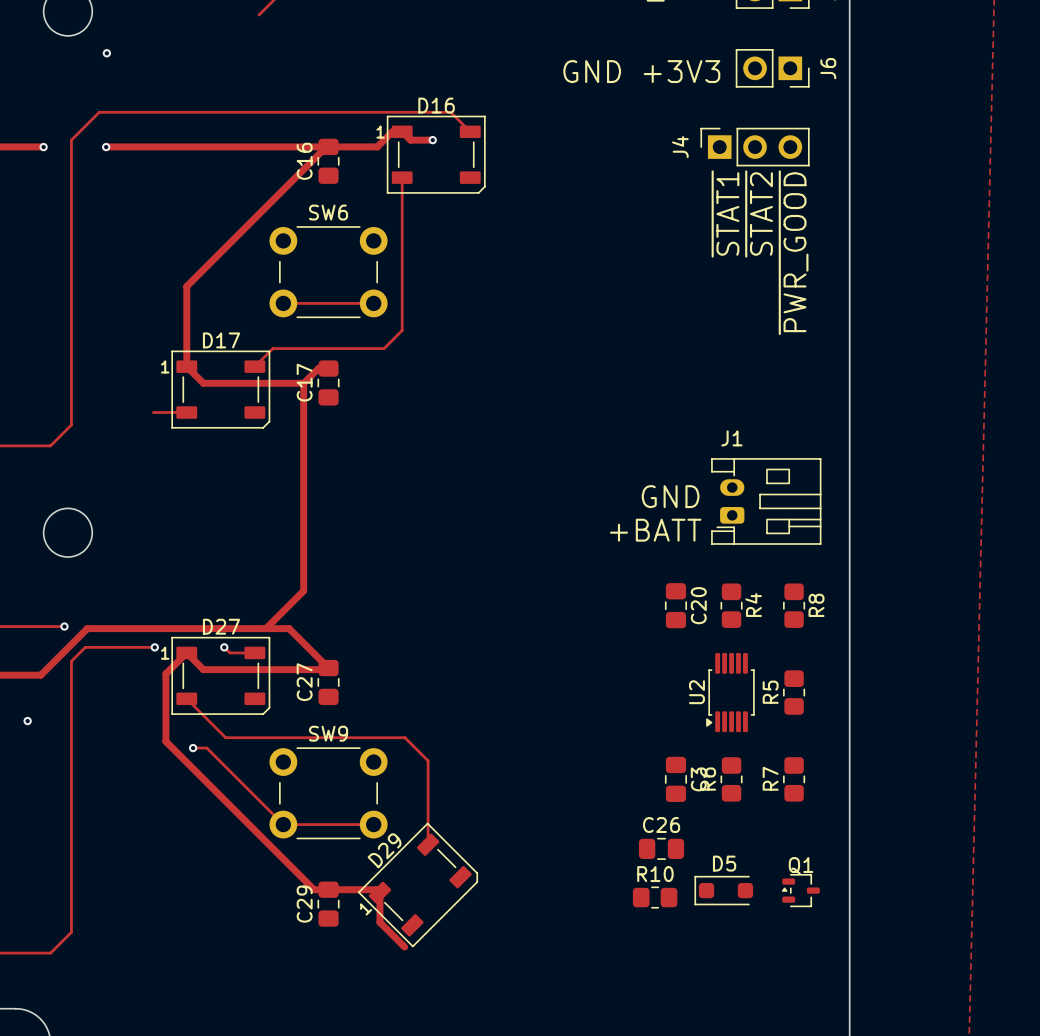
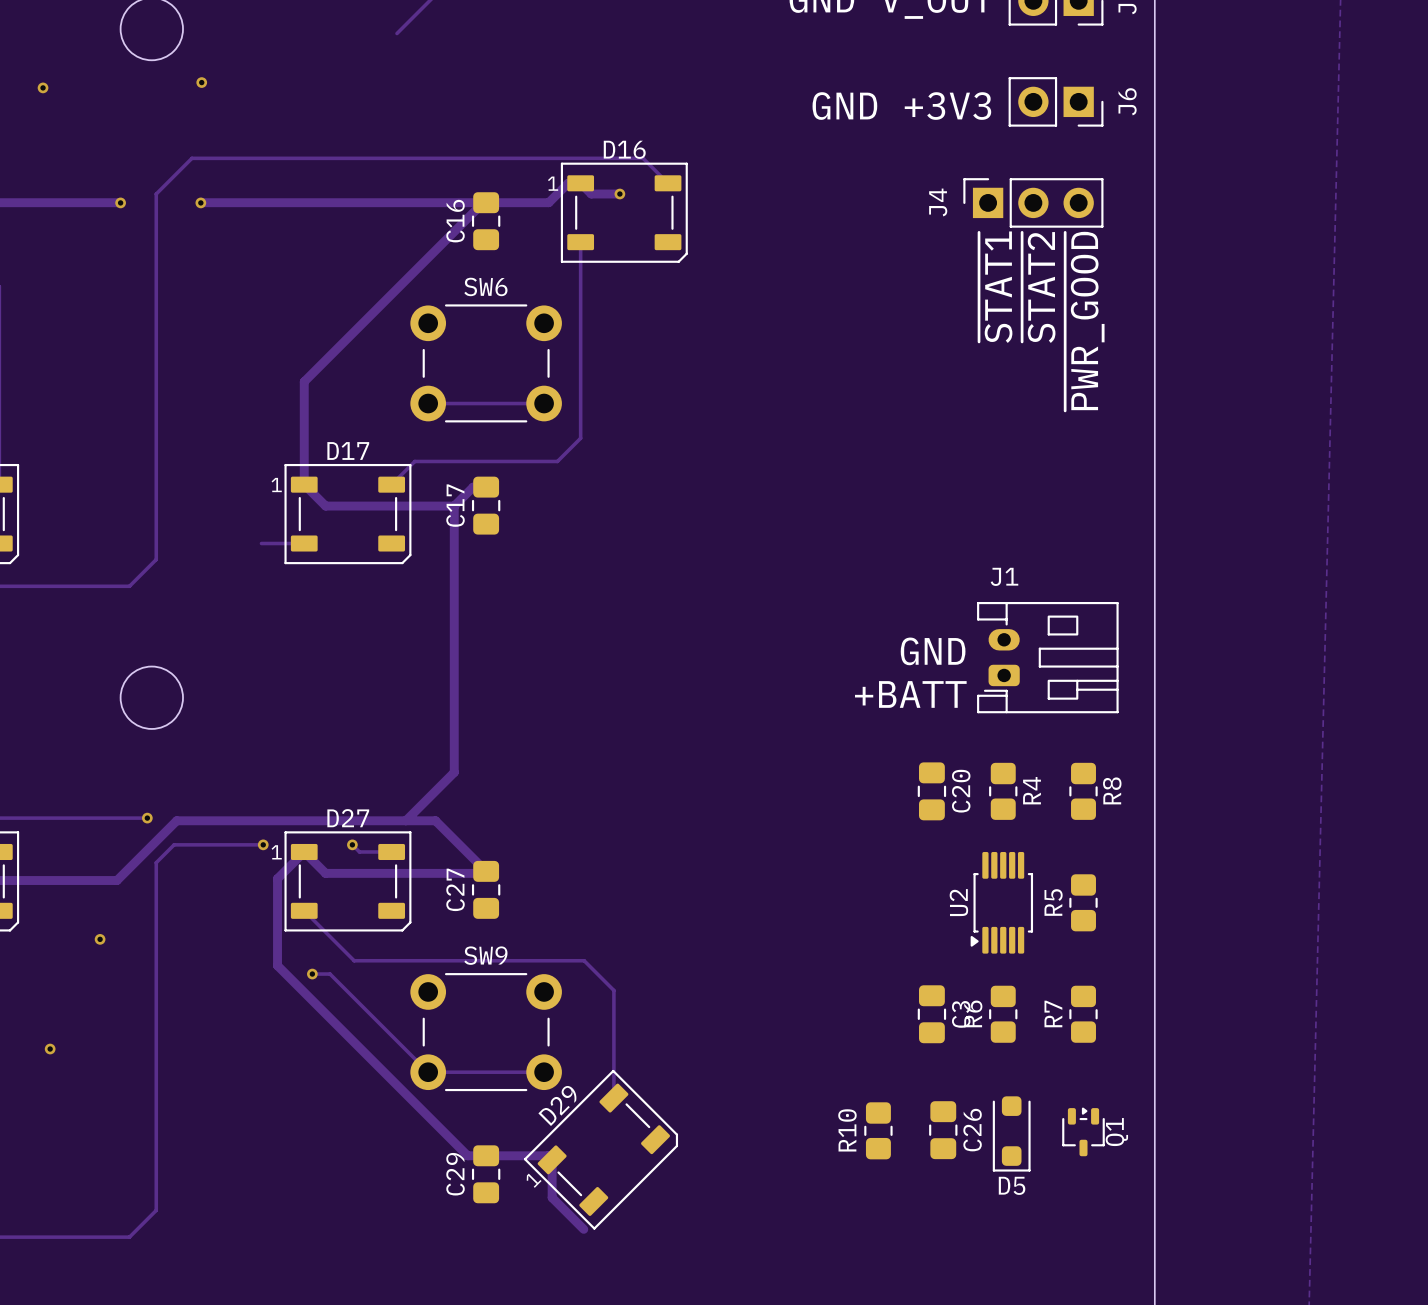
C26 rotation: 0° (661, 848) -> 90° clockwise (943, 1130)
C26 position: (661, 848) -> (943, 1130)
D5 name position: D5 (724, 863) -> D5 (1012, 1185)
R10 name position: R10 (655, 874) -> R10 (847, 1130)
D5 rotation: 0° (723, 890) -> 90° counterclockwise (1011, 1133)
Q1 rotation: 0° (800, 890) -> 90° clockwise (1083, 1131)
R10 rotation: 0° (655, 897) -> 90° clockwise (878, 1130)
R10 position: (655, 897) -> (878, 1130)

